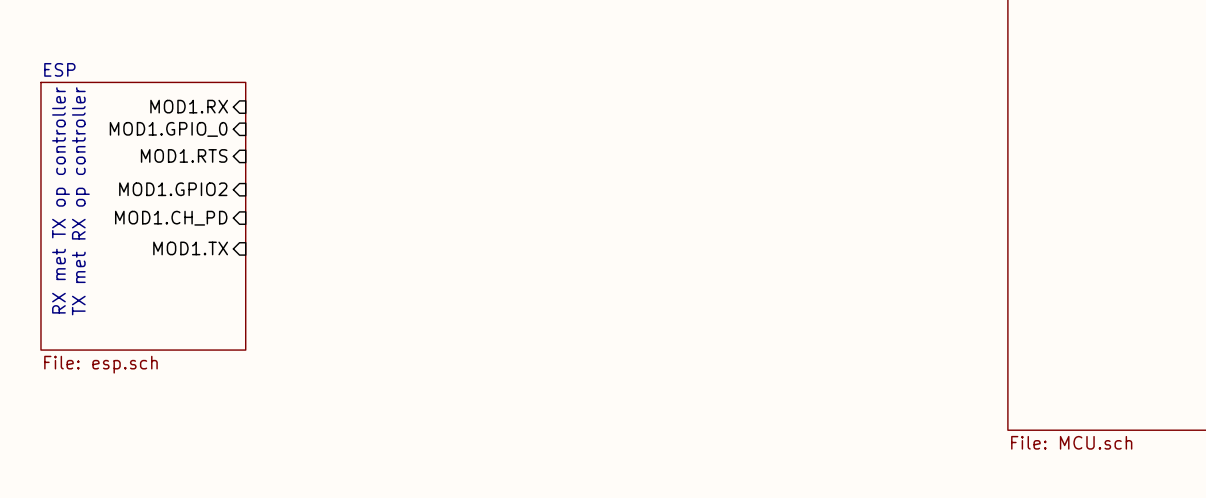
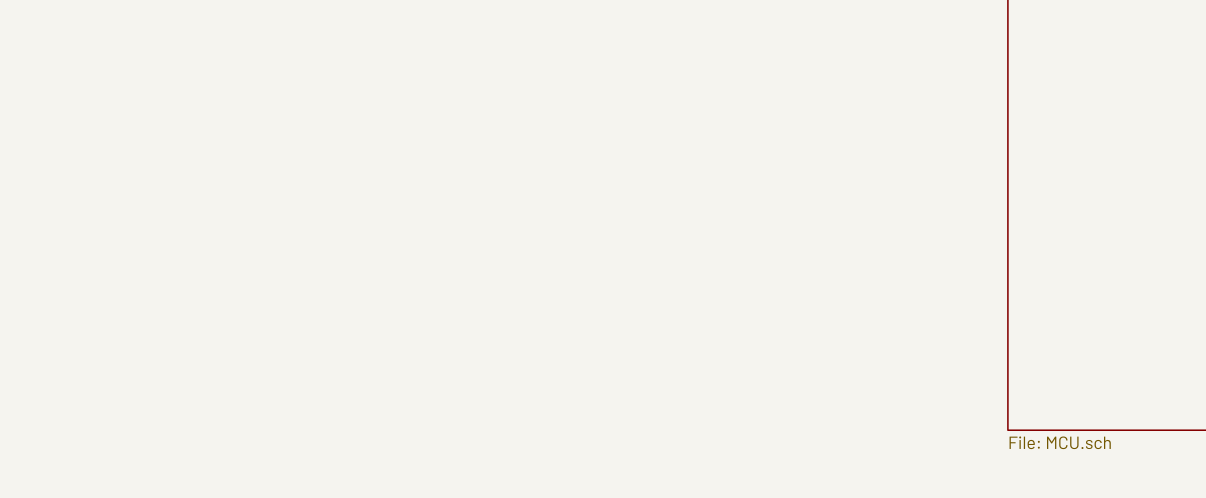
sheet pin: MOD1.RX (189, 106) -> none
sheet pin: MOD1.GPIO_0 (168, 129) -> none
sheet pin: MOD1.RTS (184, 155) -> none
sheet pin: MOD1.GPIO2 (173, 189) -> none
text: RX met TX op controller (61, 200) -> none
text: TX met RX op controller (80, 201) -> none
sheet ESP: File: esp.sch (143, 216) -> none
sheet pin: MOD1.CH_PD (171, 218) -> none
sheet pin: MOD1.TX (190, 248) -> none

